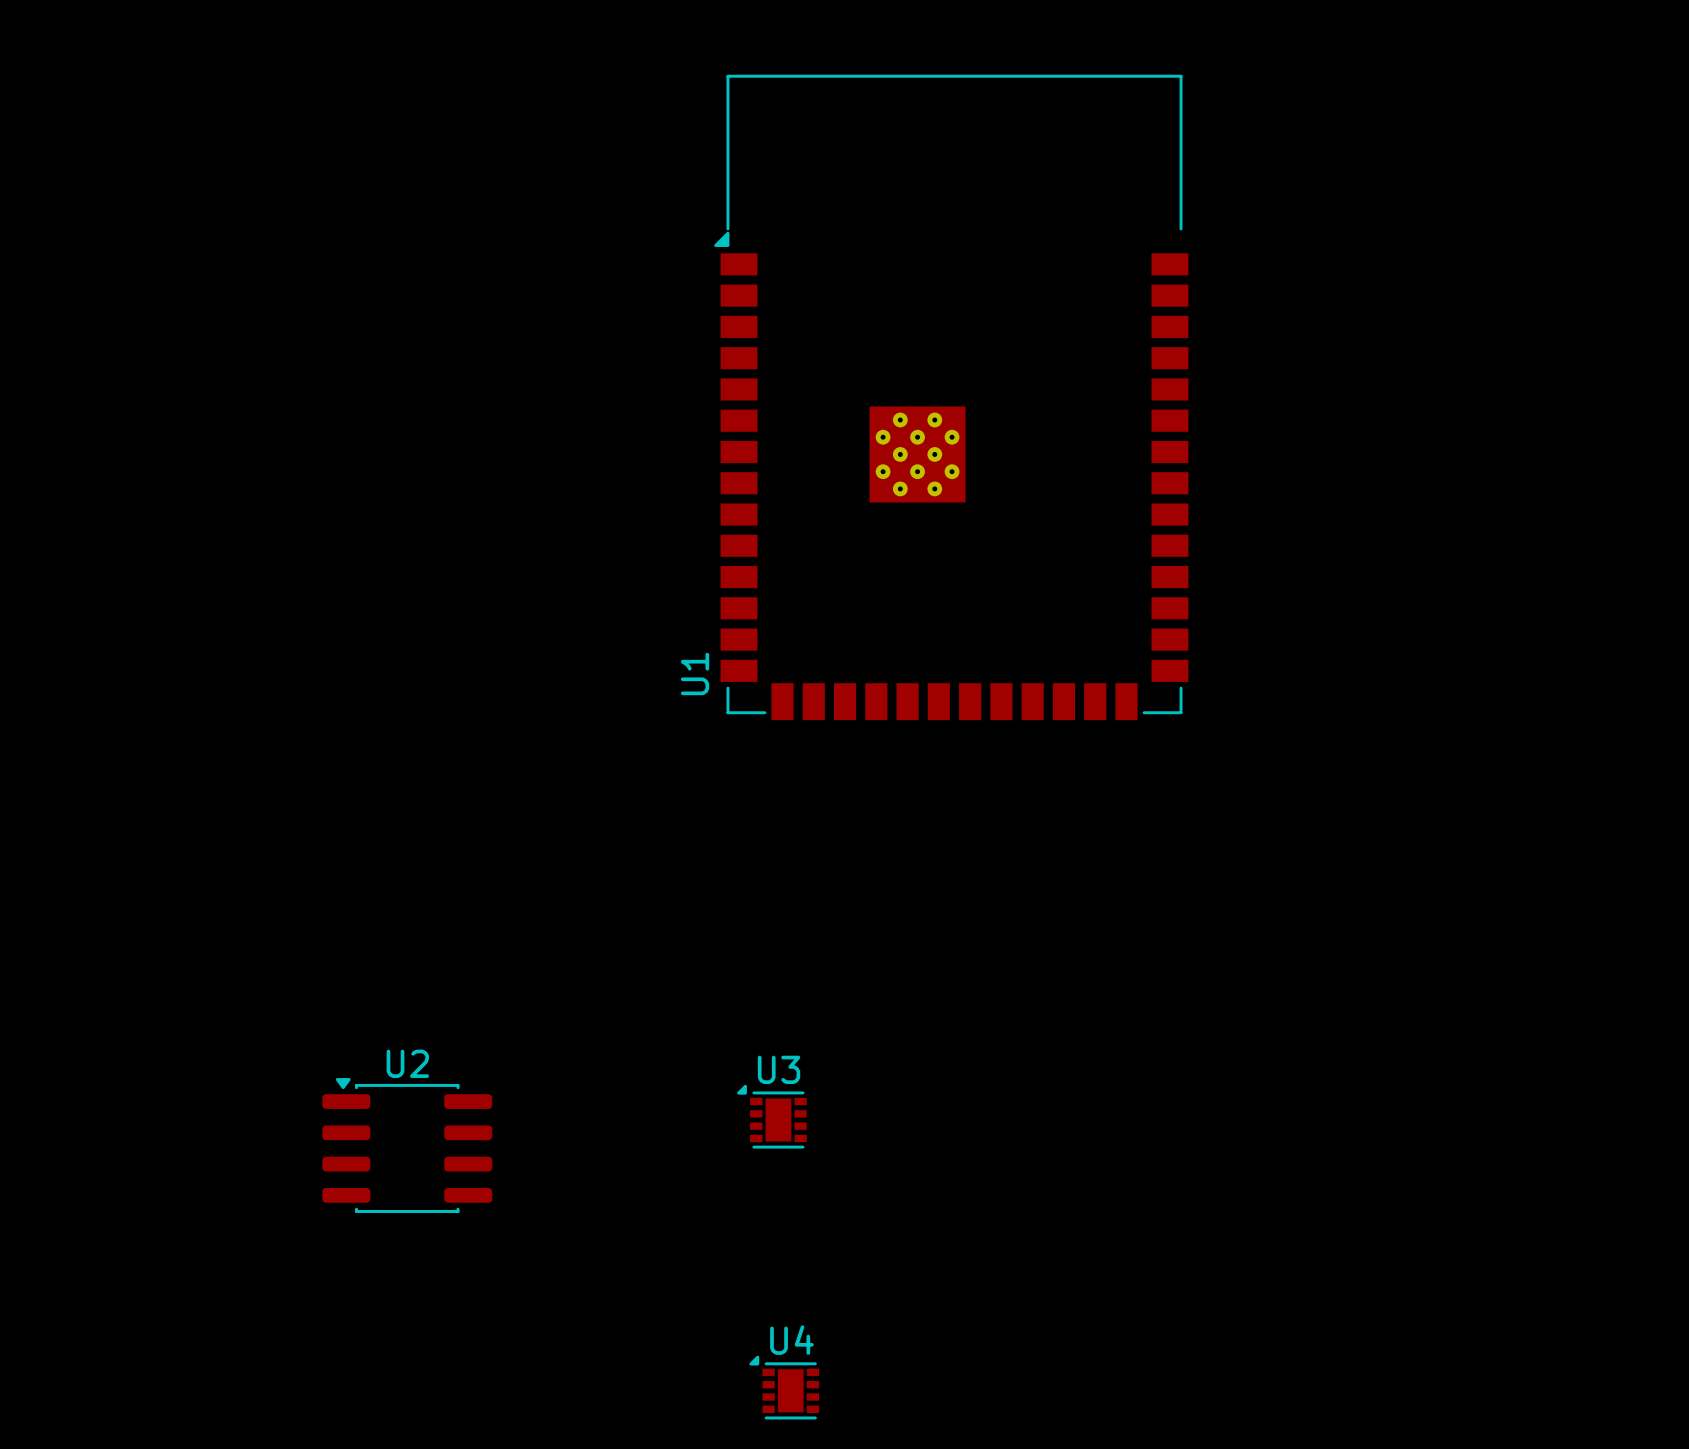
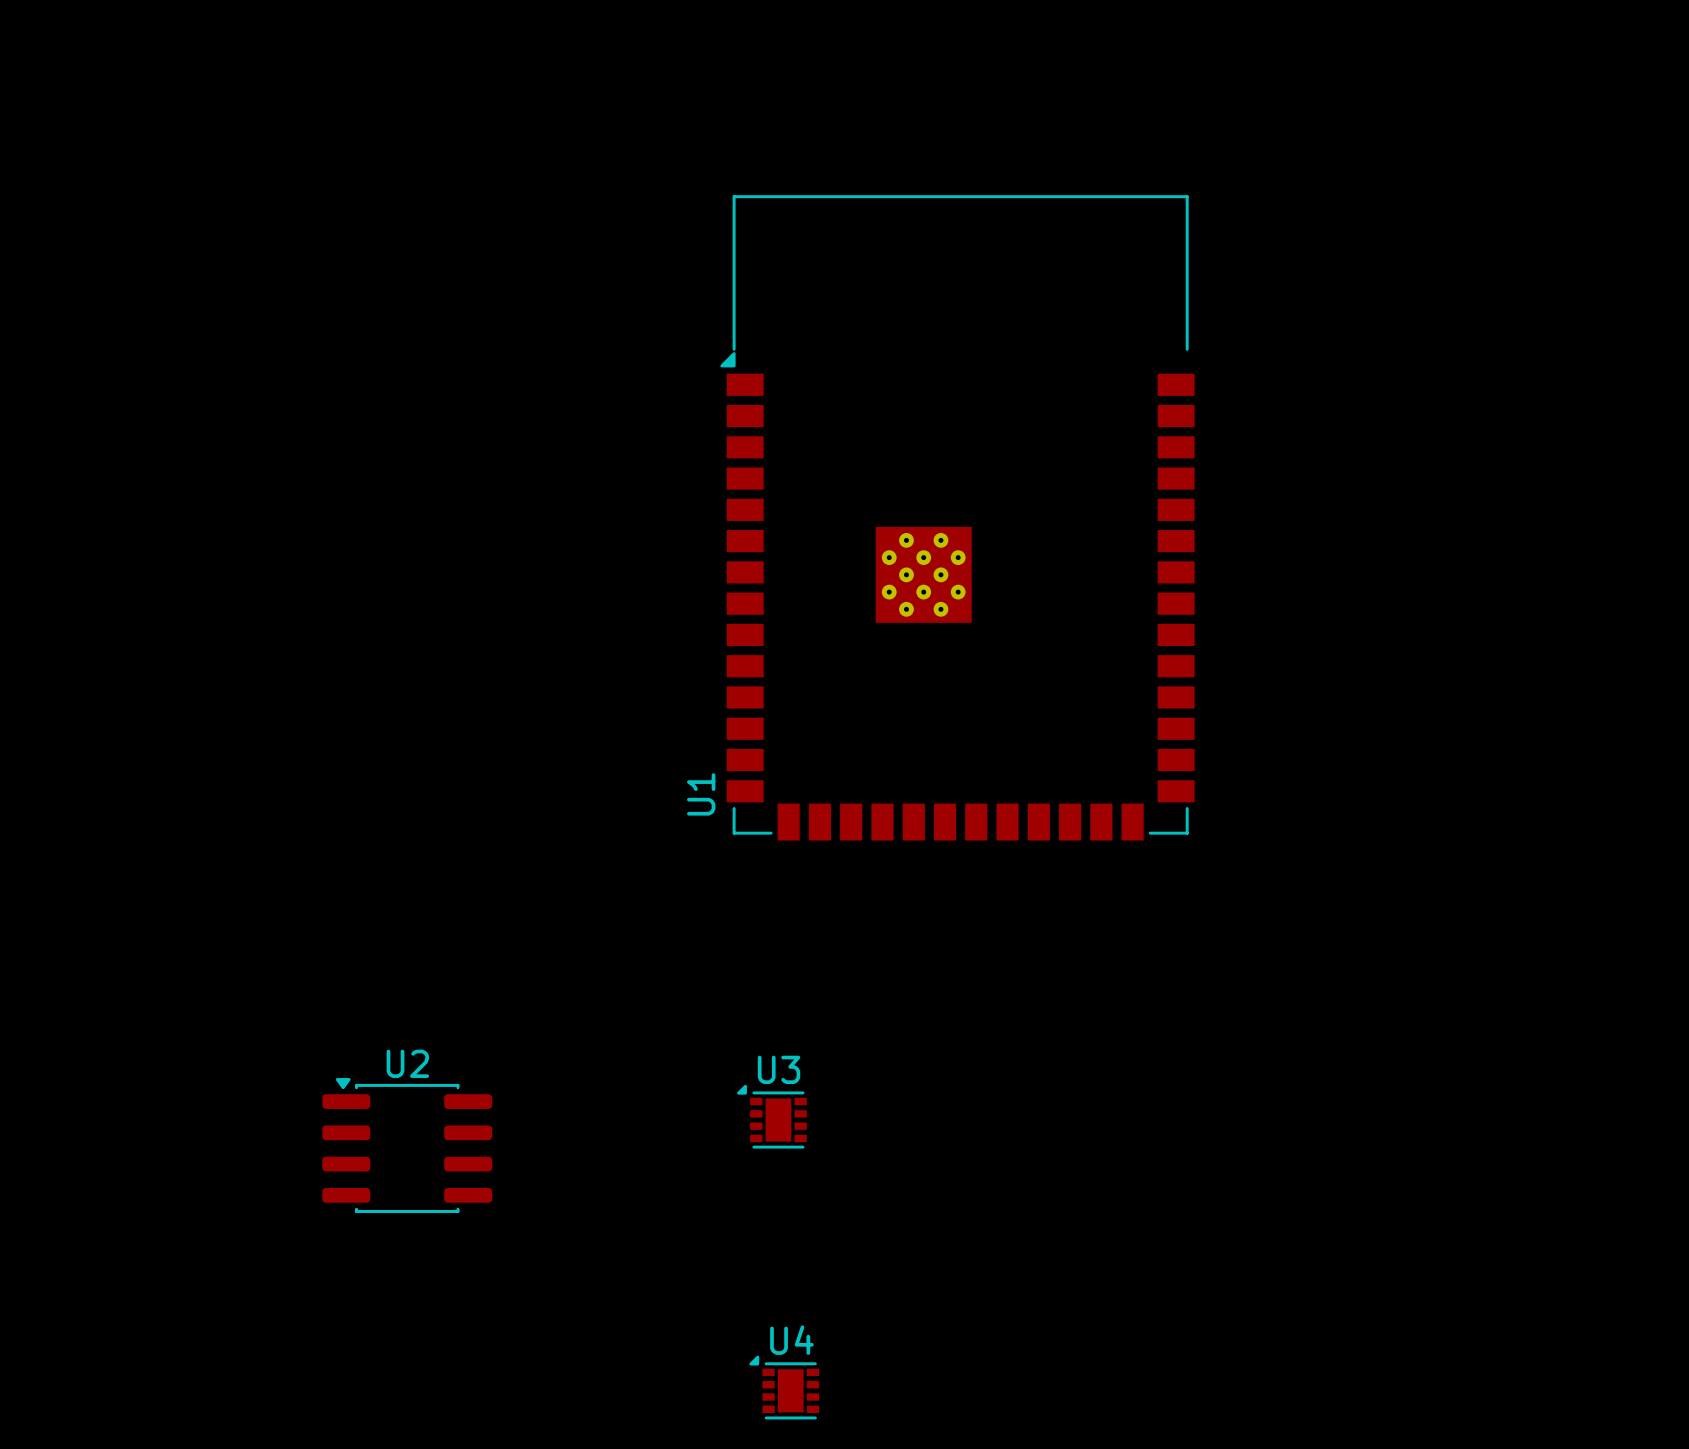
U1 position: (951, 397) -> (957, 517)

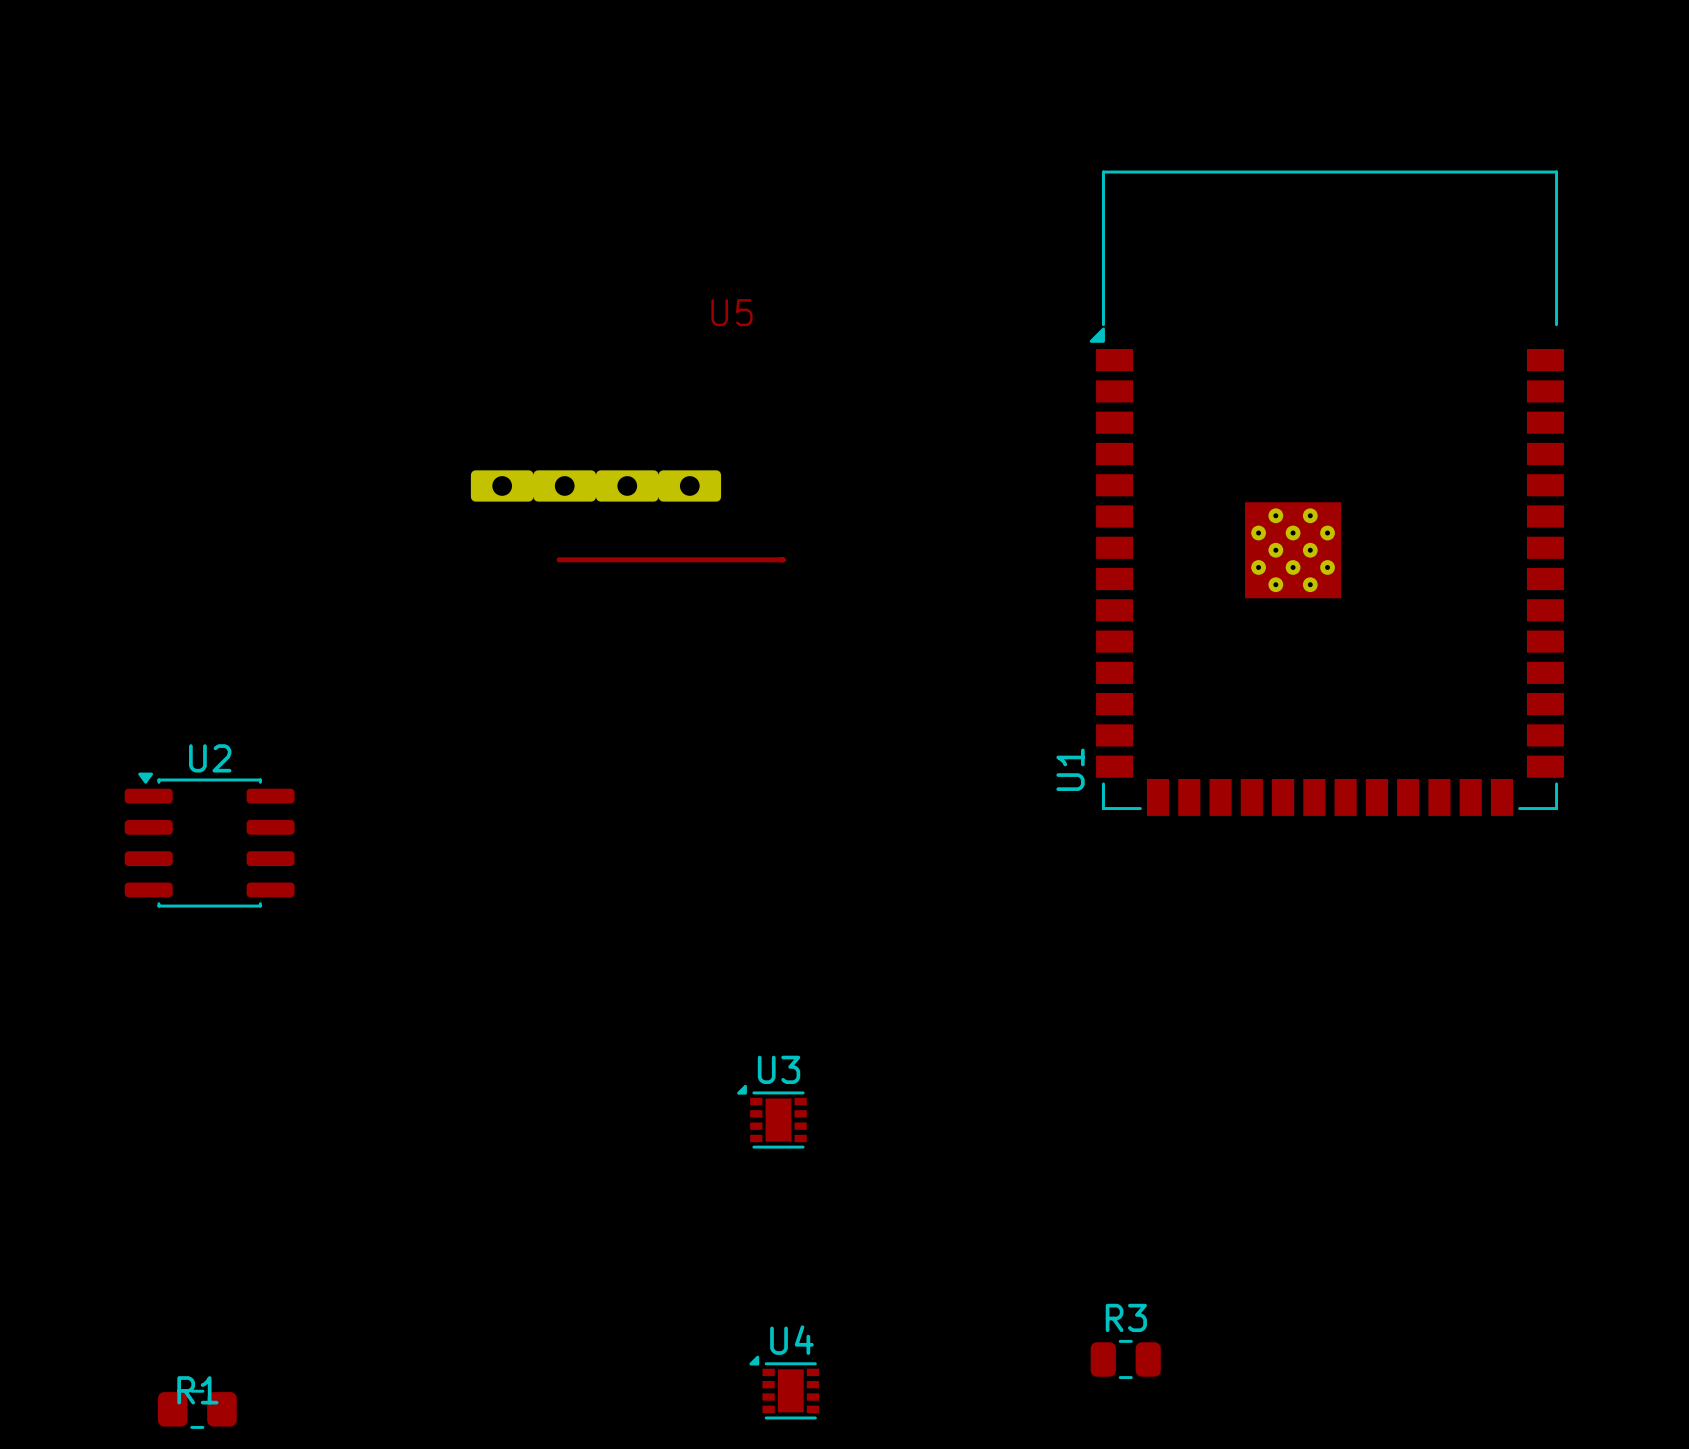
U5: none -> (628, 516)
U1 position: (957, 517) -> (1326, 493)
U2 position: (407, 1145) -> (209, 840)
R3: none -> (1125, 1359)
R1: none -> (197, 1409)

